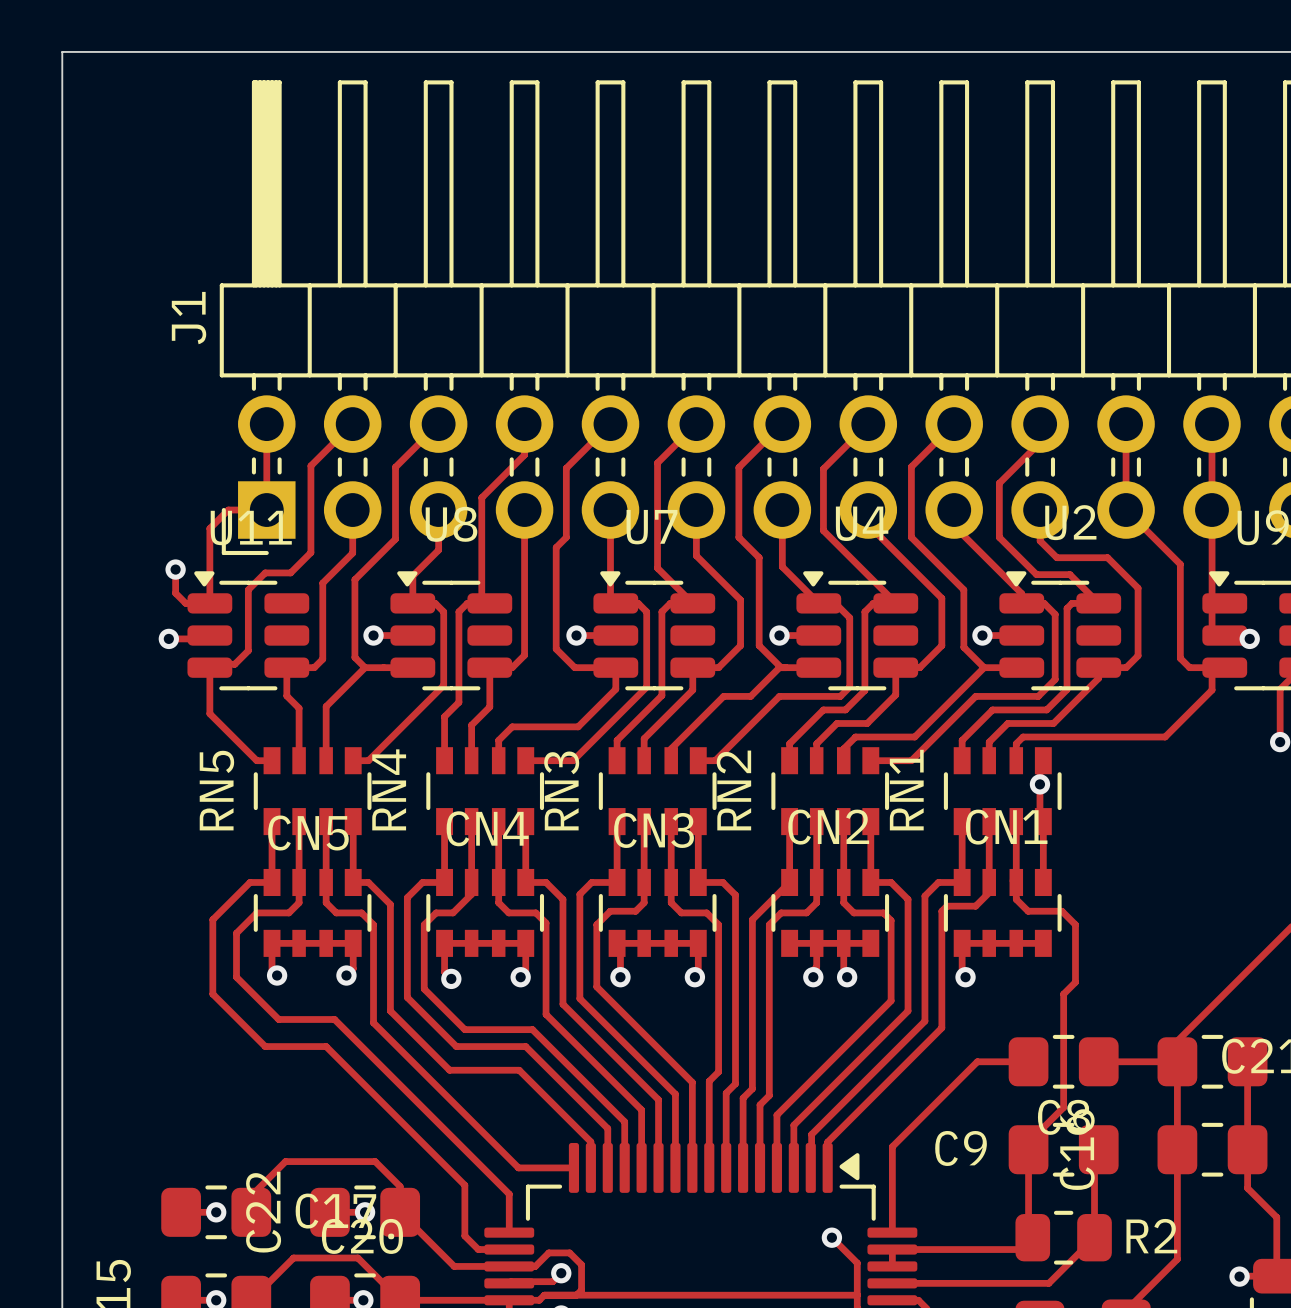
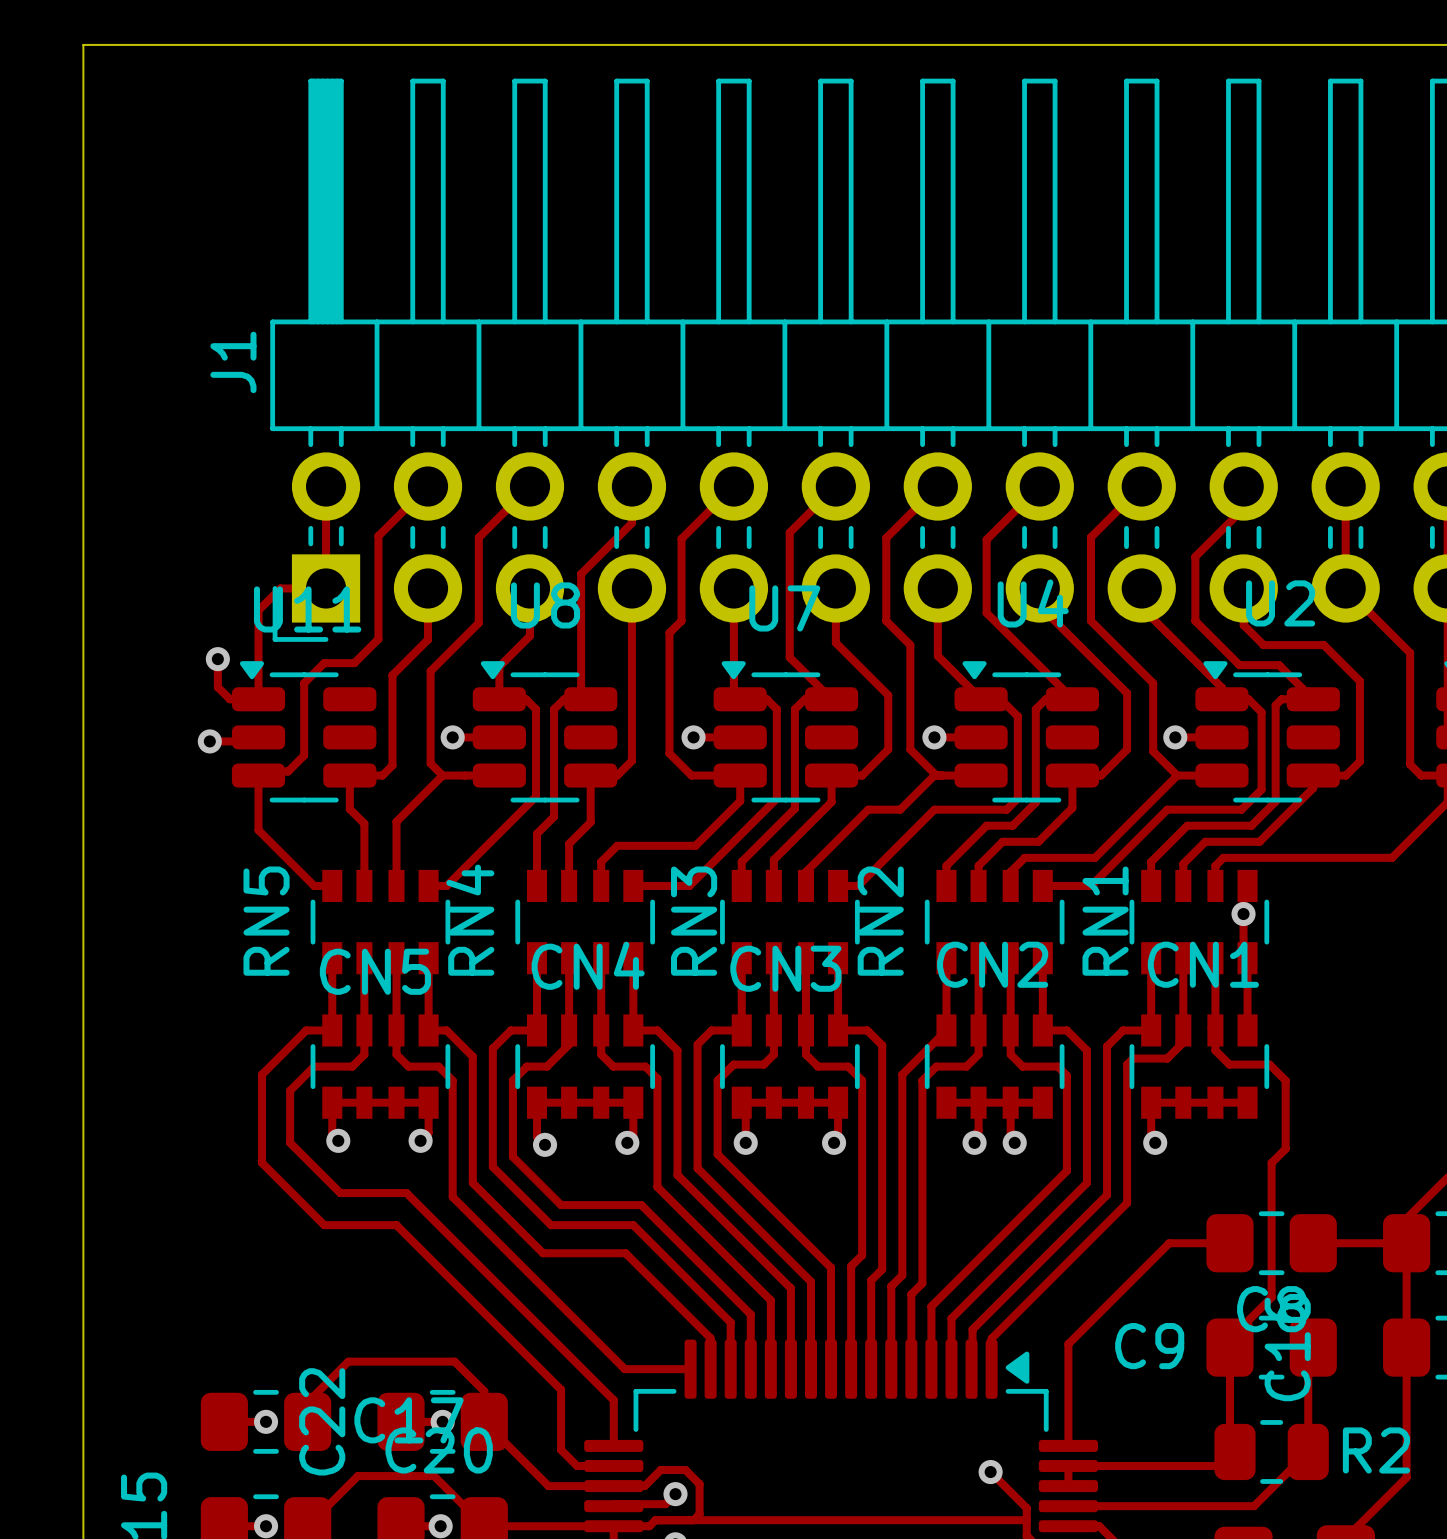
RN3 name position: RN3 (561, 790) -> RN3 (694, 921)
RN1 name position: RN1 (906, 790) -> RN1 (1105, 921)
track: (831, 1237) (857, 1263) (857, 1285) -> (990, 1472) (1026, 1508)
via position: (831, 1237) -> (990, 1472)

